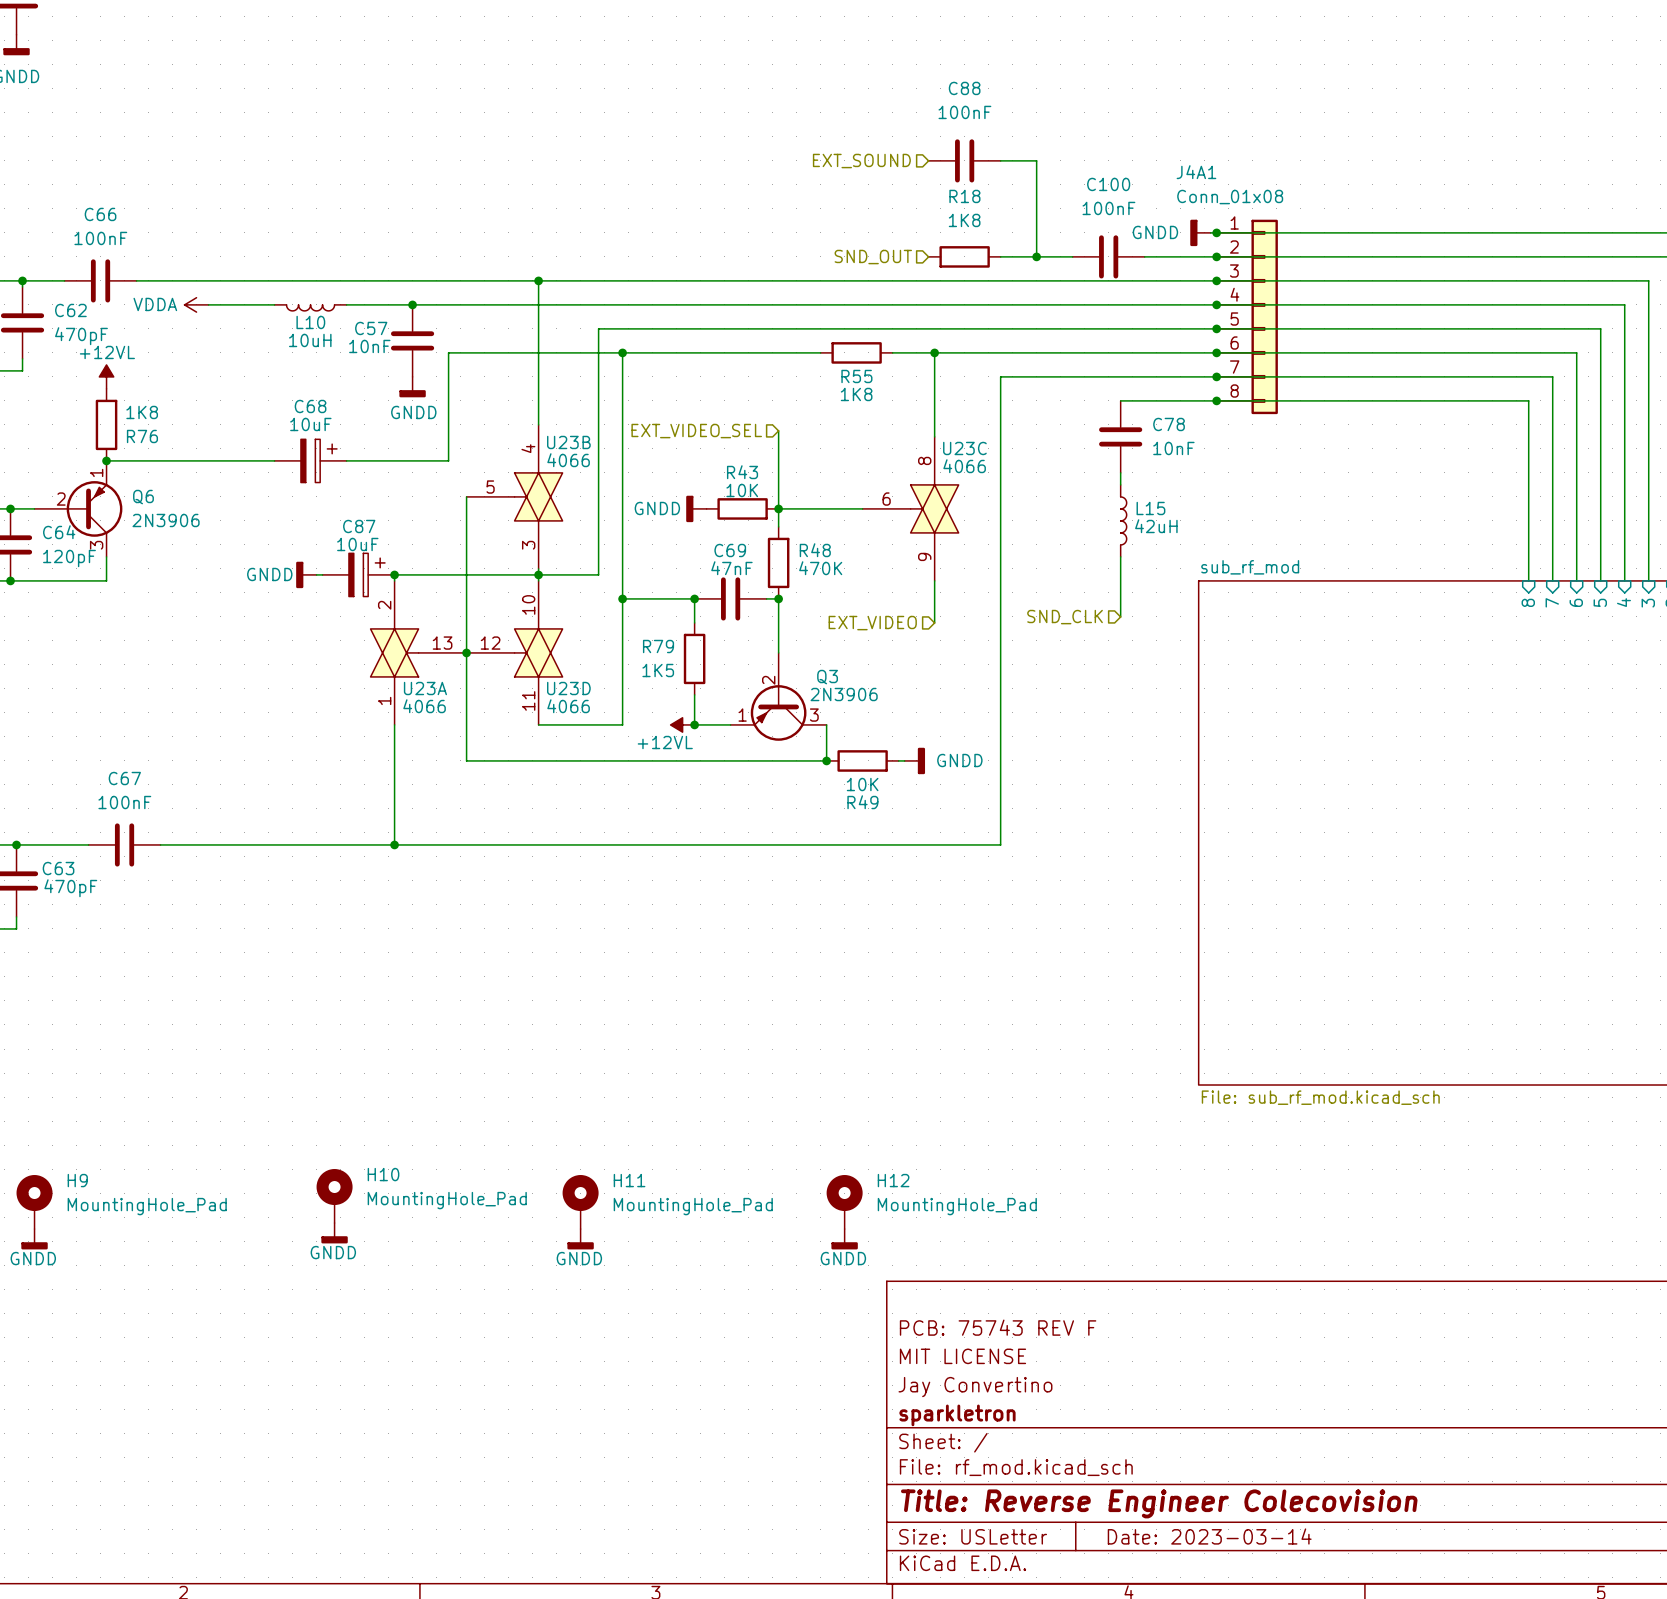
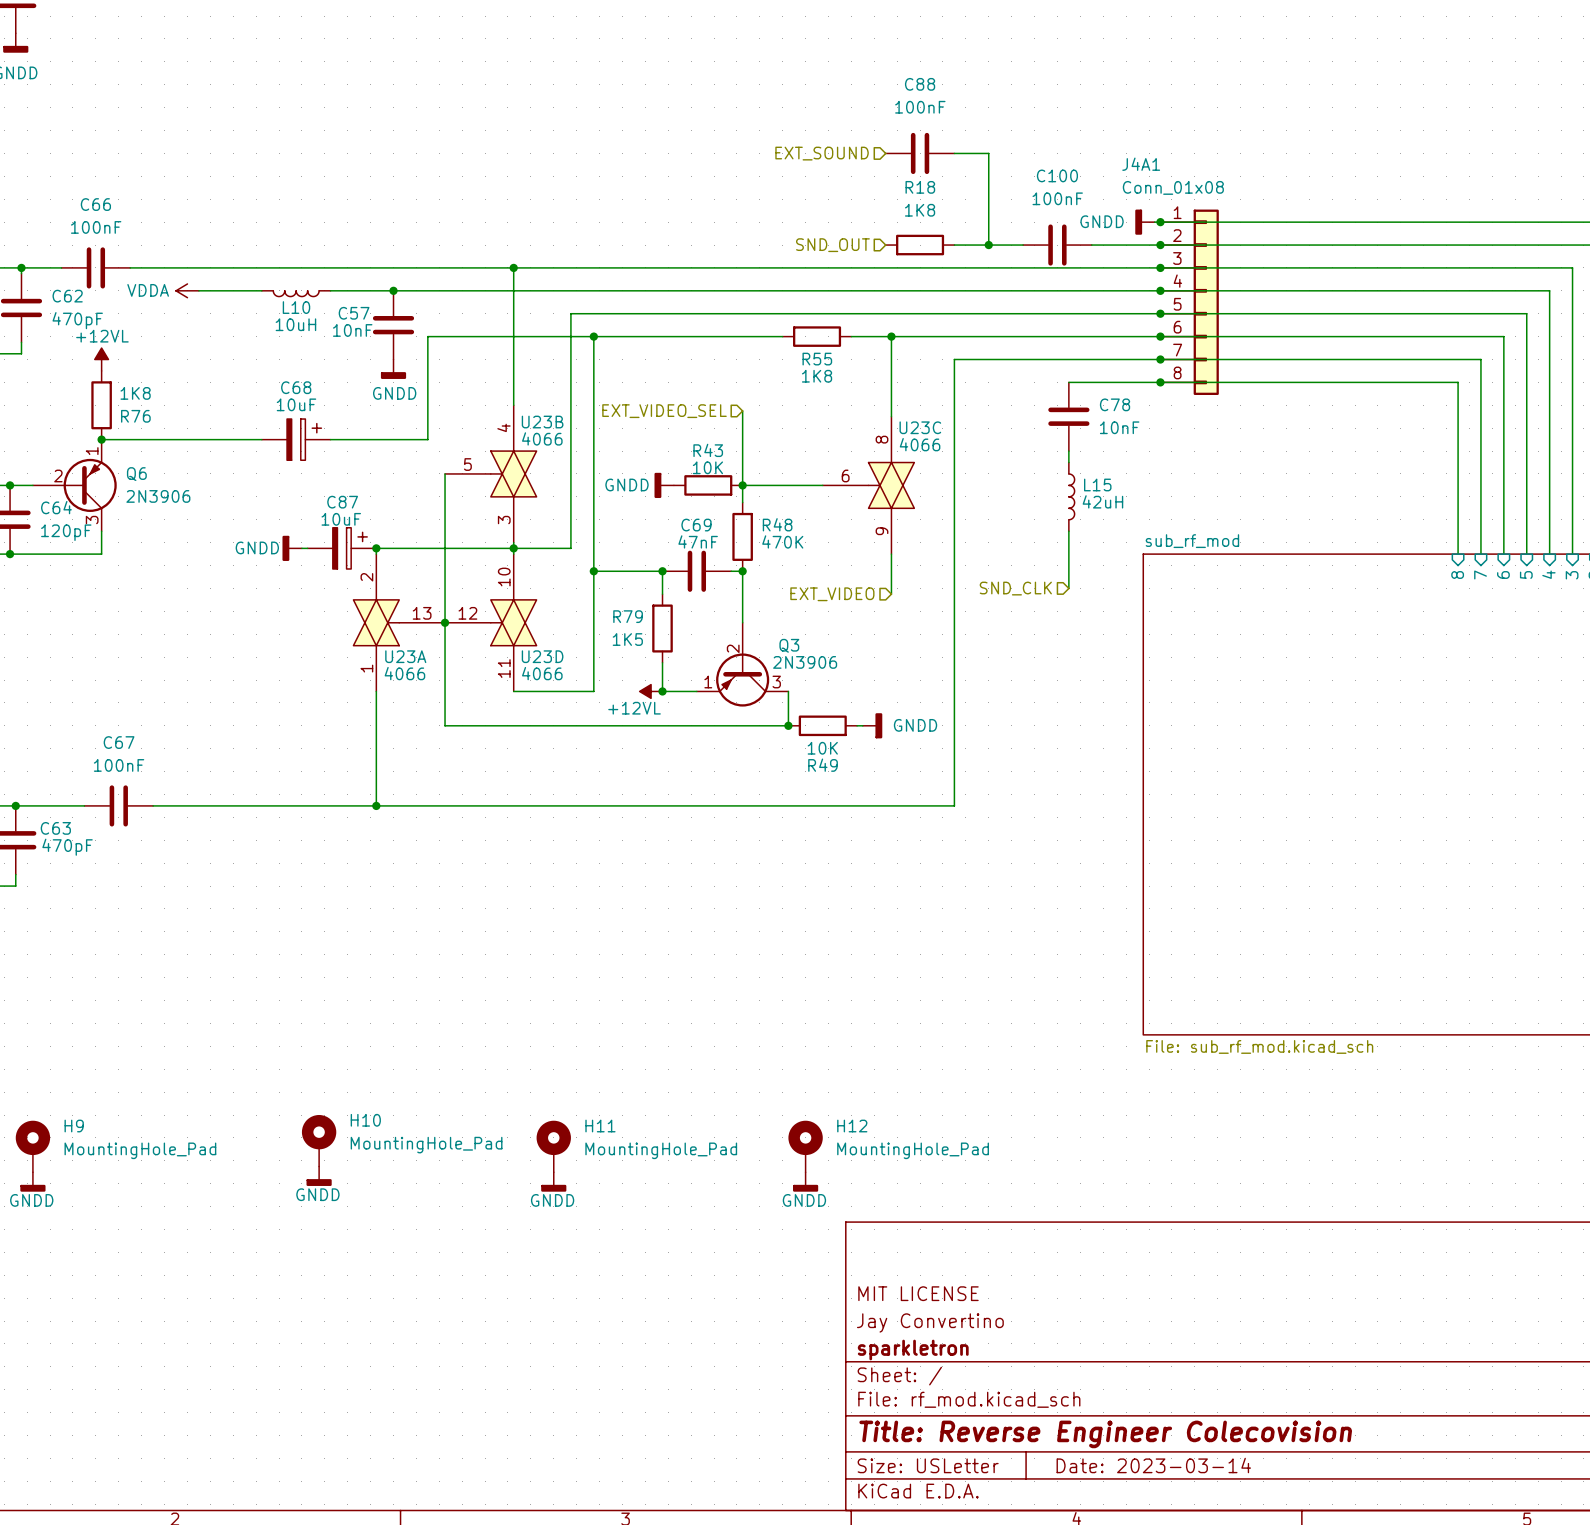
title block: PCB: 75743 REV F (998, 1327) -> none

